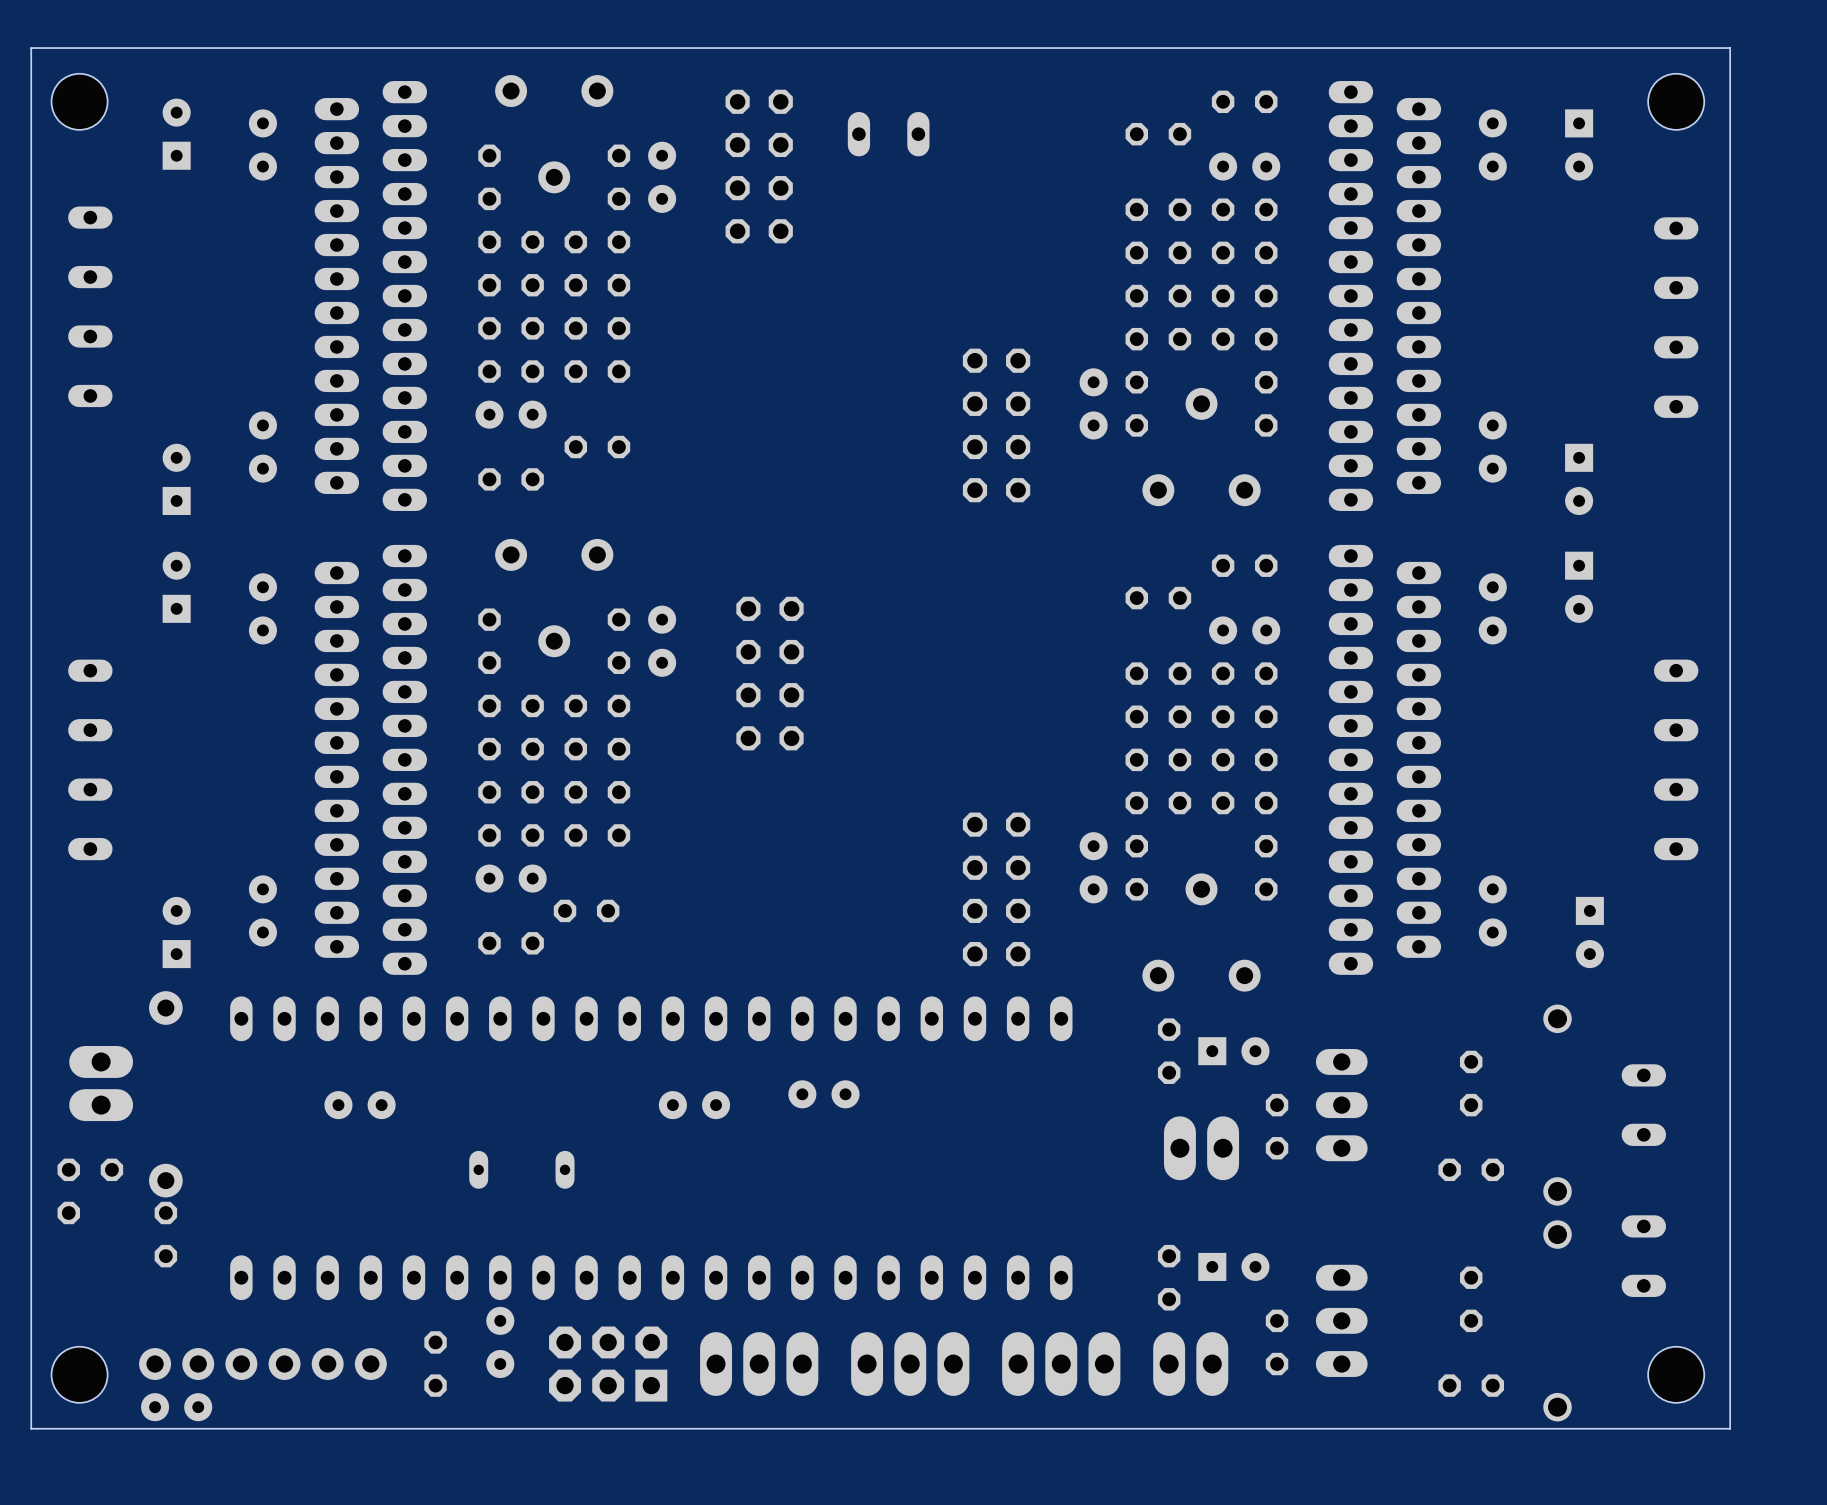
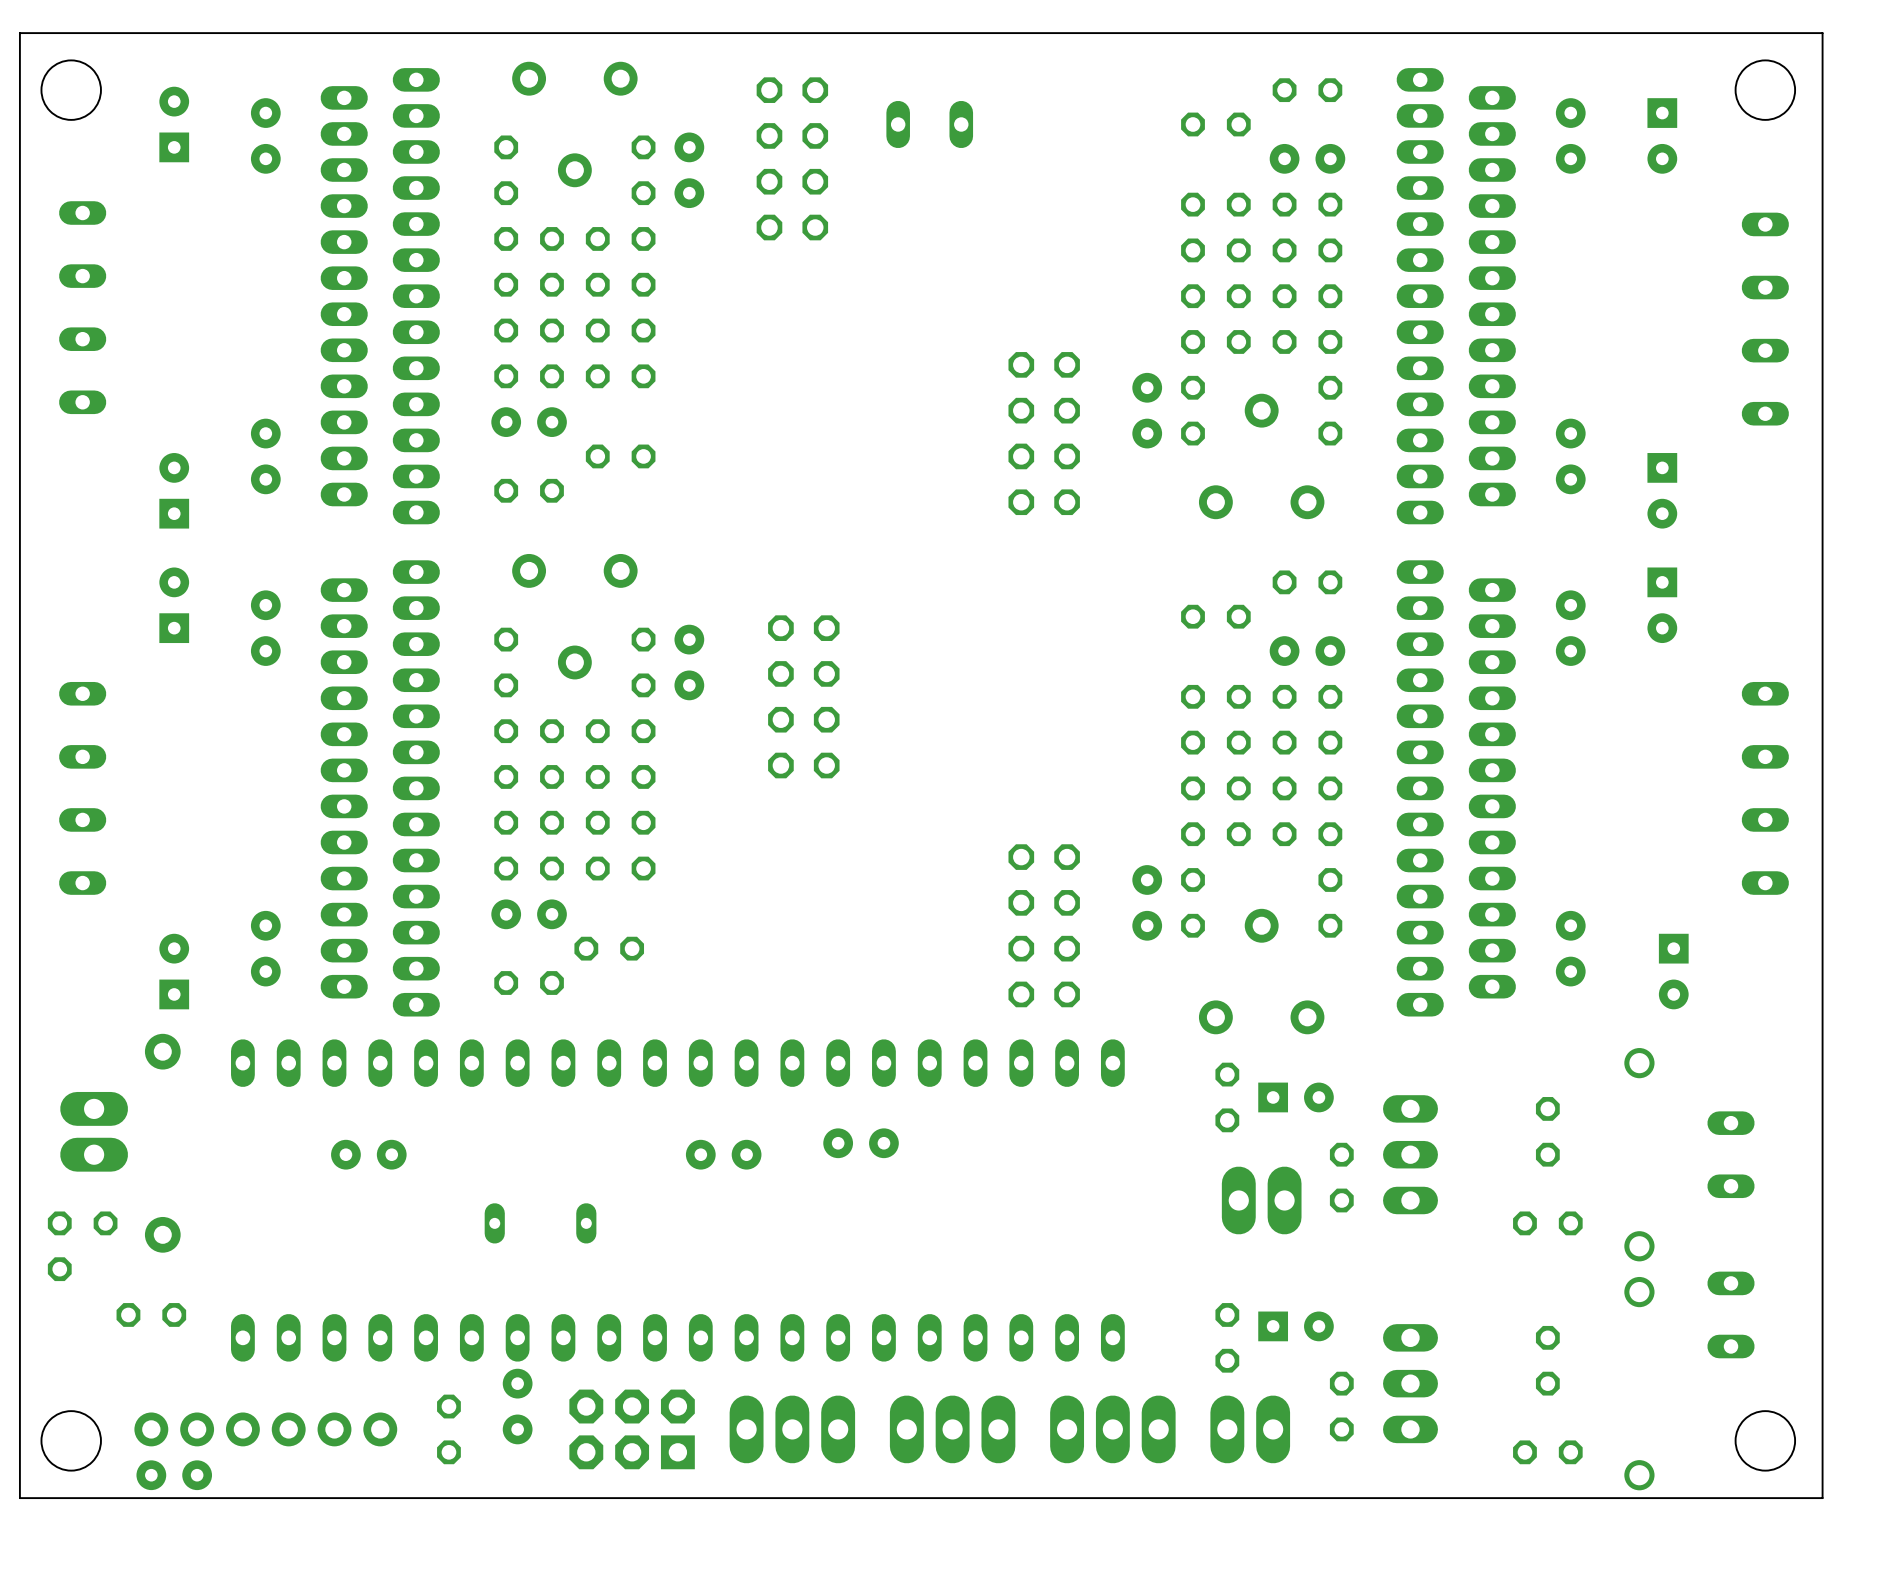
part rotation: 0° (165, 1234) -> 90° clockwise (151, 1314)

